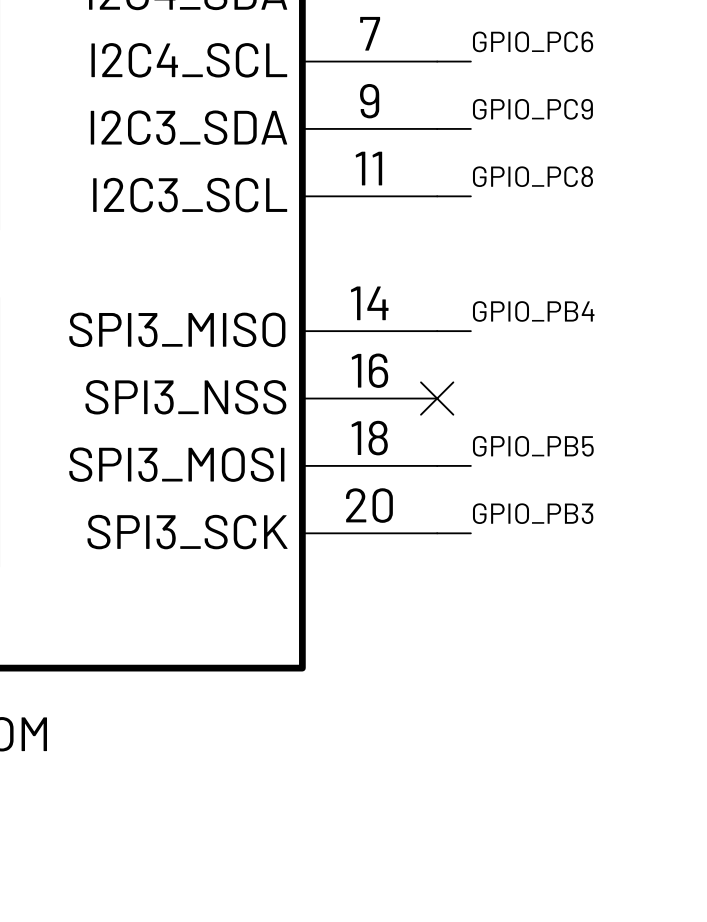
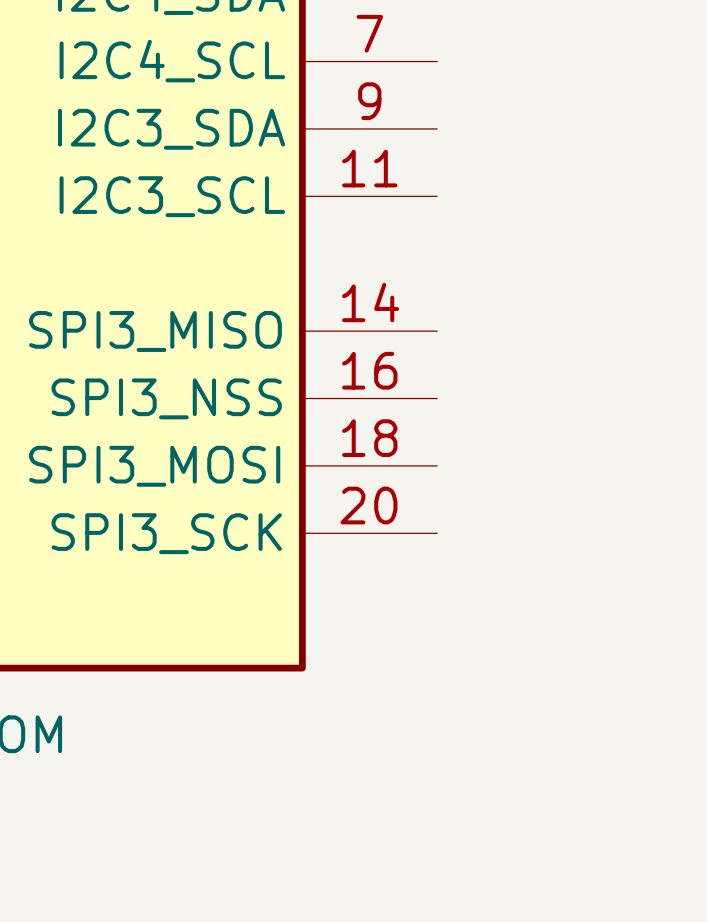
label: GPIO_PC6 (533, 41) -> none
wire: (437, 61) (470, 61) -> none
label: GPIO_PC9 (532, 109) -> none
wire: (437, 128) (470, 128) -> none
label: GPIO_PC8 (532, 176) -> none
wire: (437, 196) (470, 196) -> none
label: GPIO_PB4 (533, 311) -> none
wire: (437, 331) (470, 331) -> none
no-connect mark: (437, 398) -> none
label: GPIO_PB5 (533, 446) -> none
wire: (437, 465) (470, 465) -> none
label: GPIO_PB3 (533, 513) -> none
wire: (437, 533) (470, 533) -> none

